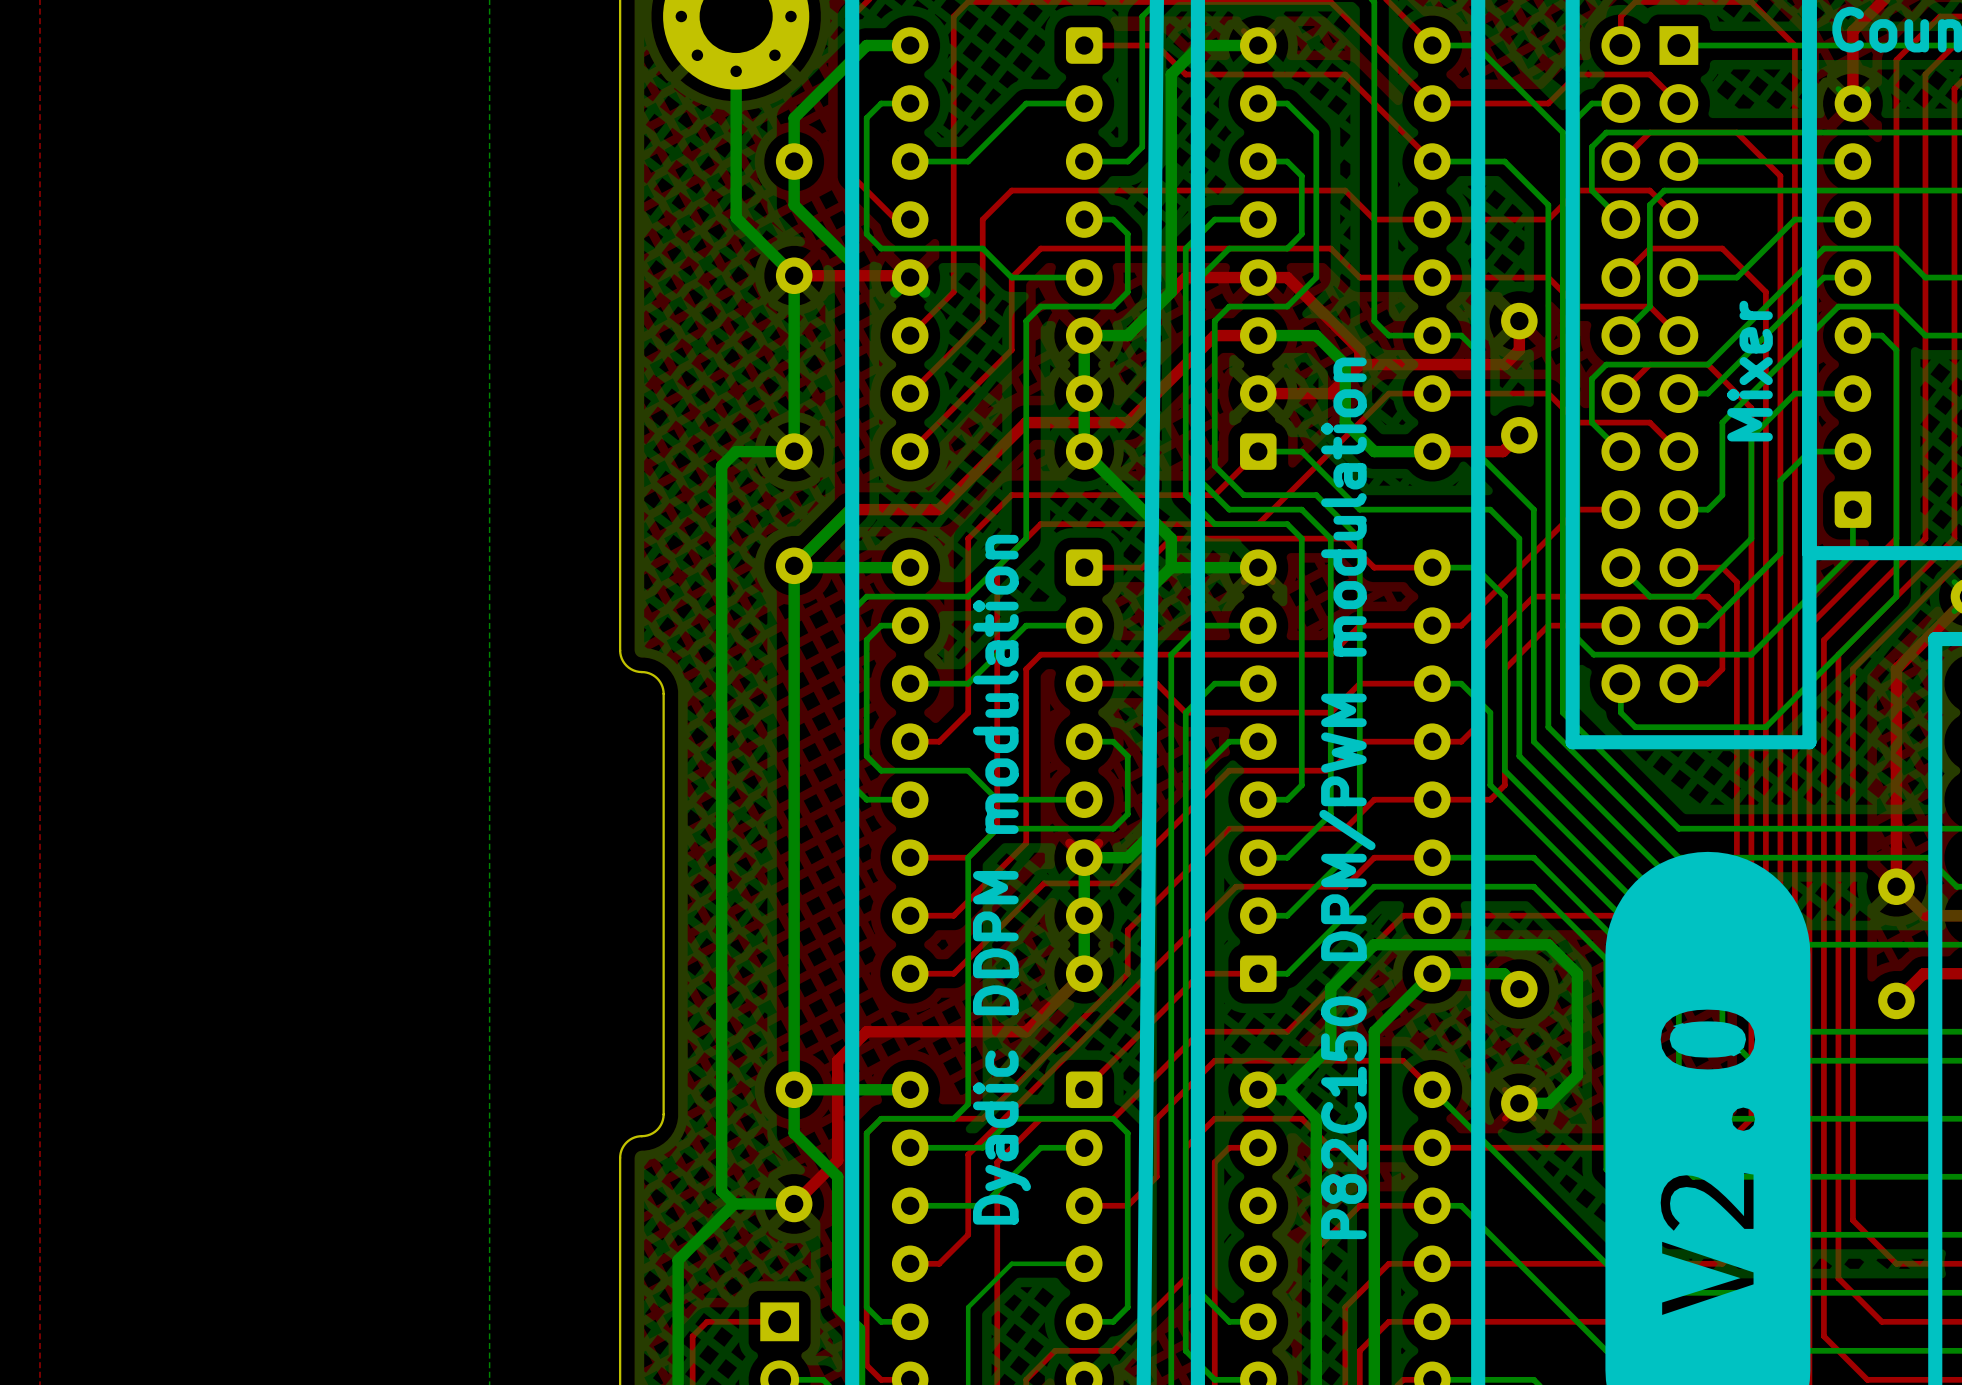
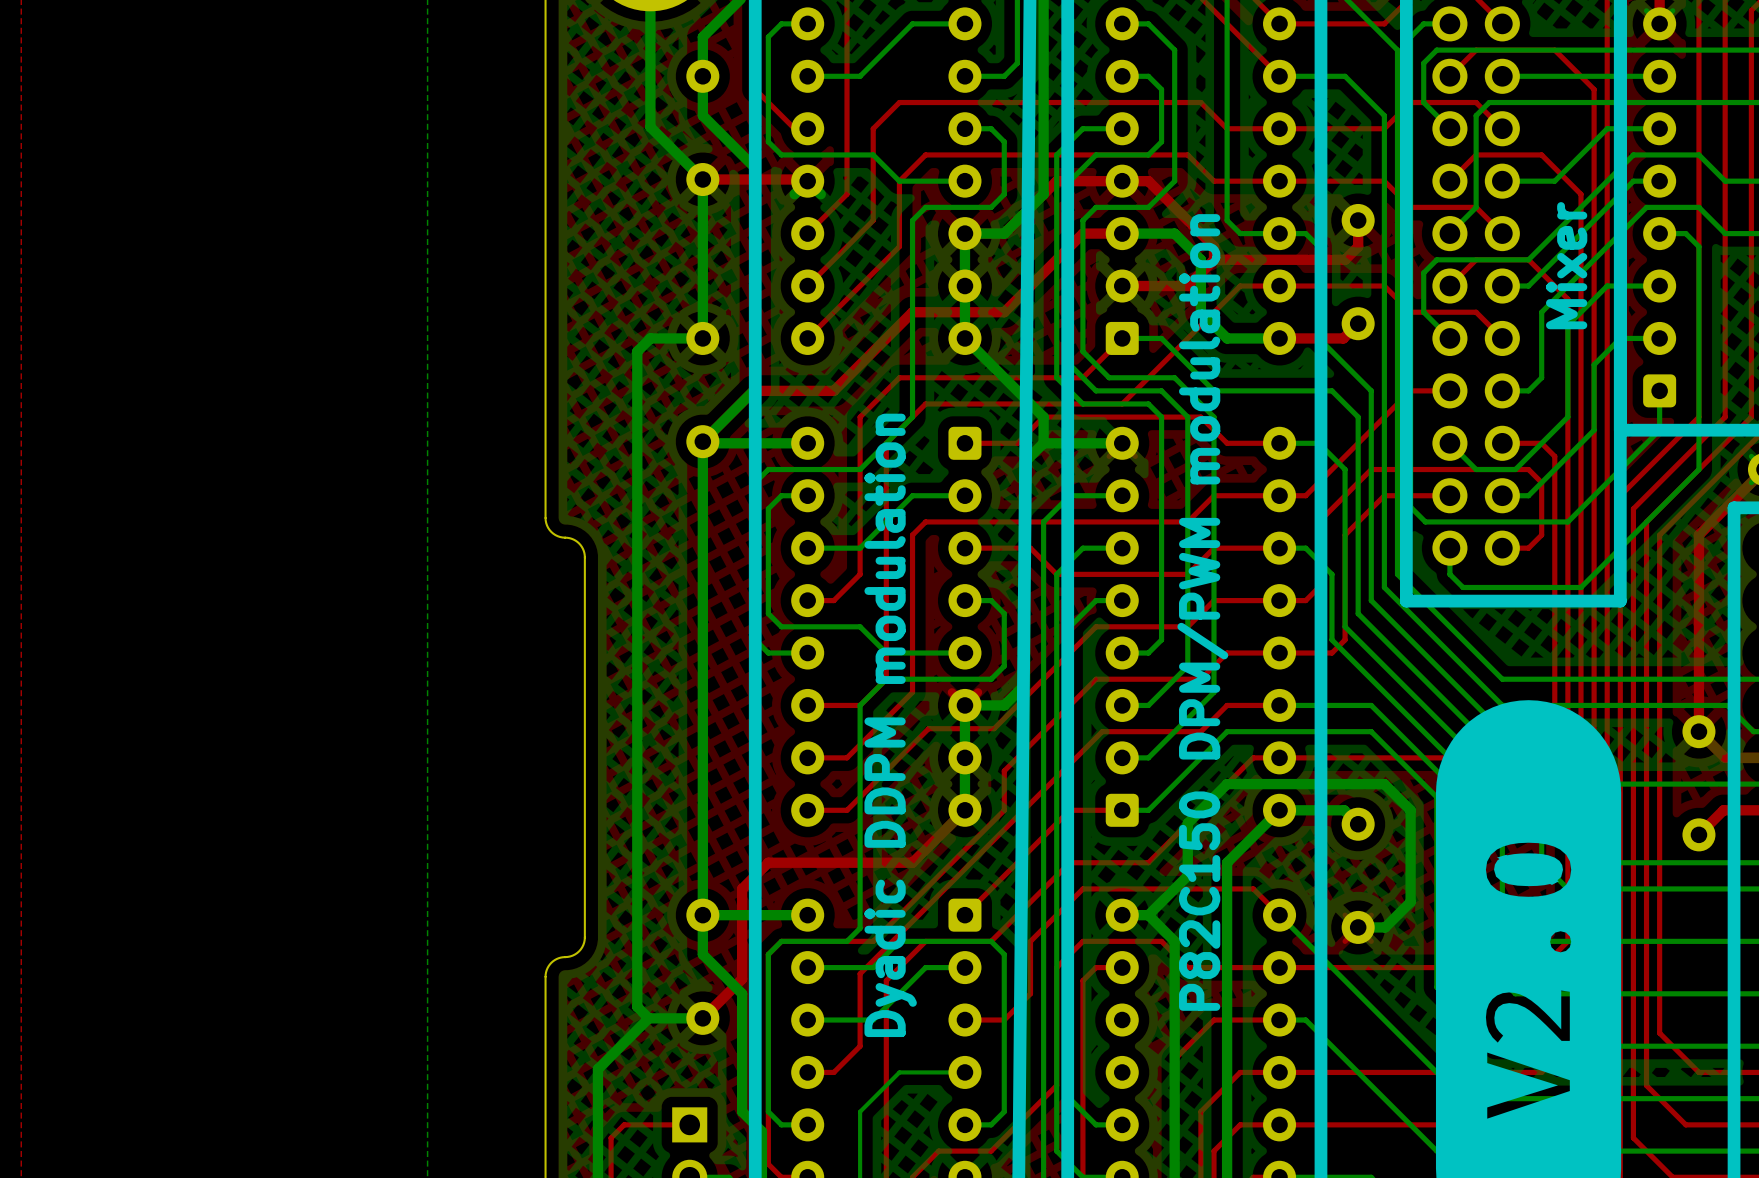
text position: P82C150 DPM/PWM modulation (1347, 798) -> P82C150 DPM/PWM modulation (1202, 612)

